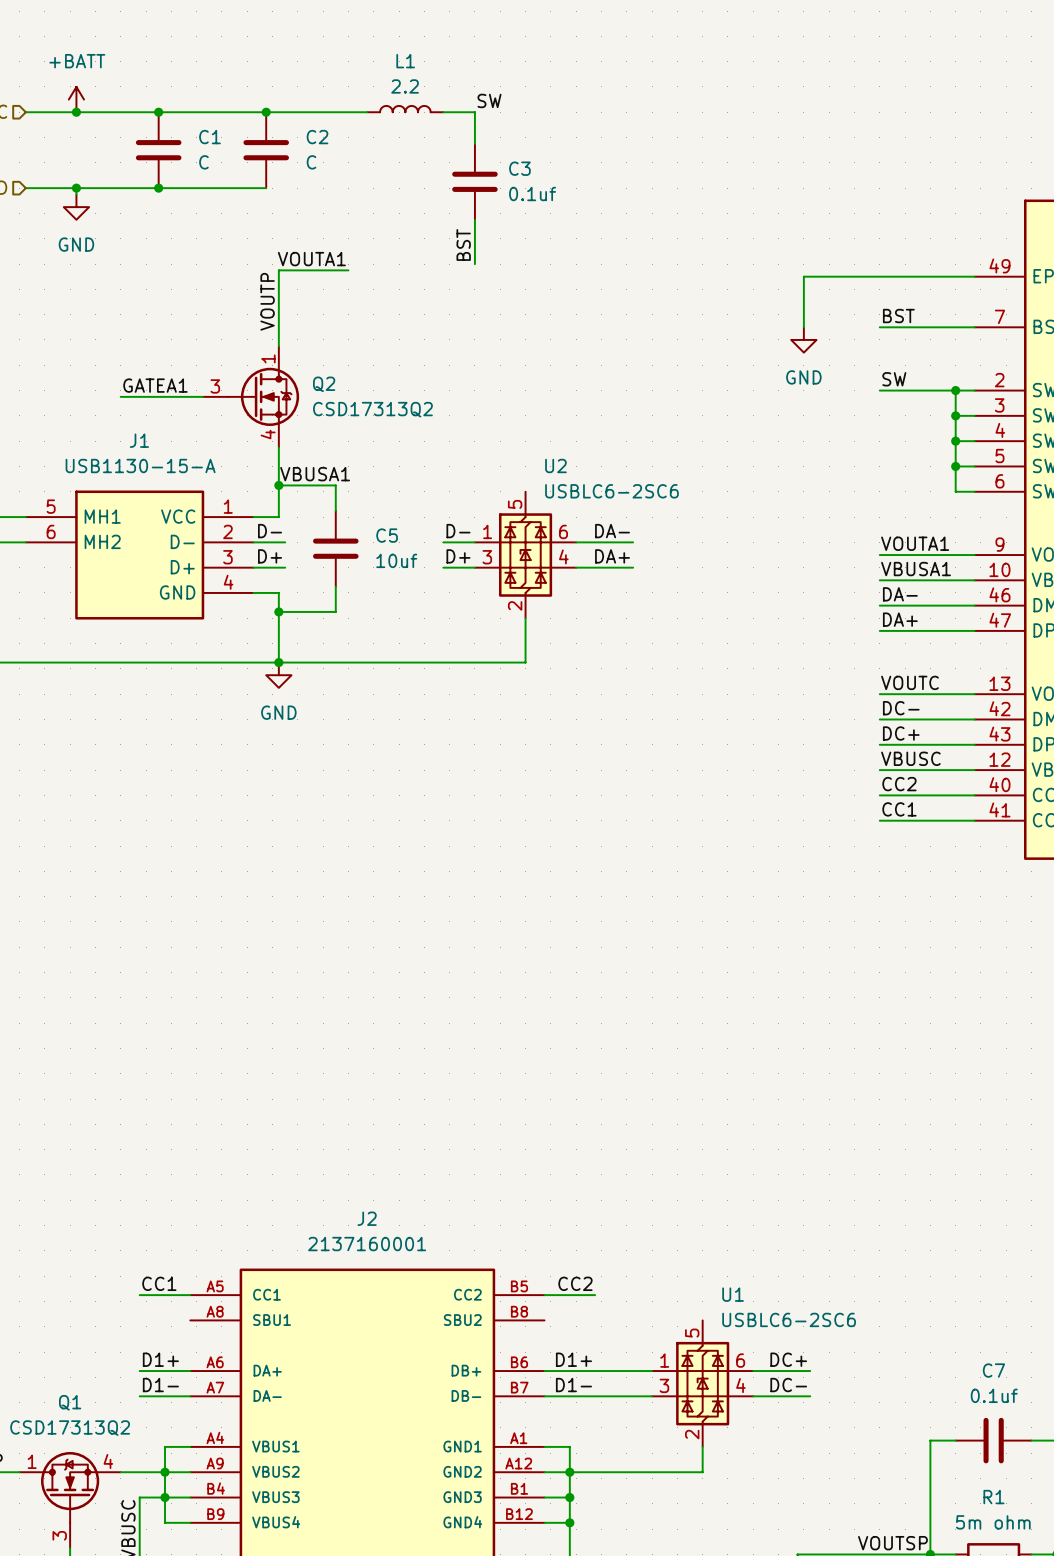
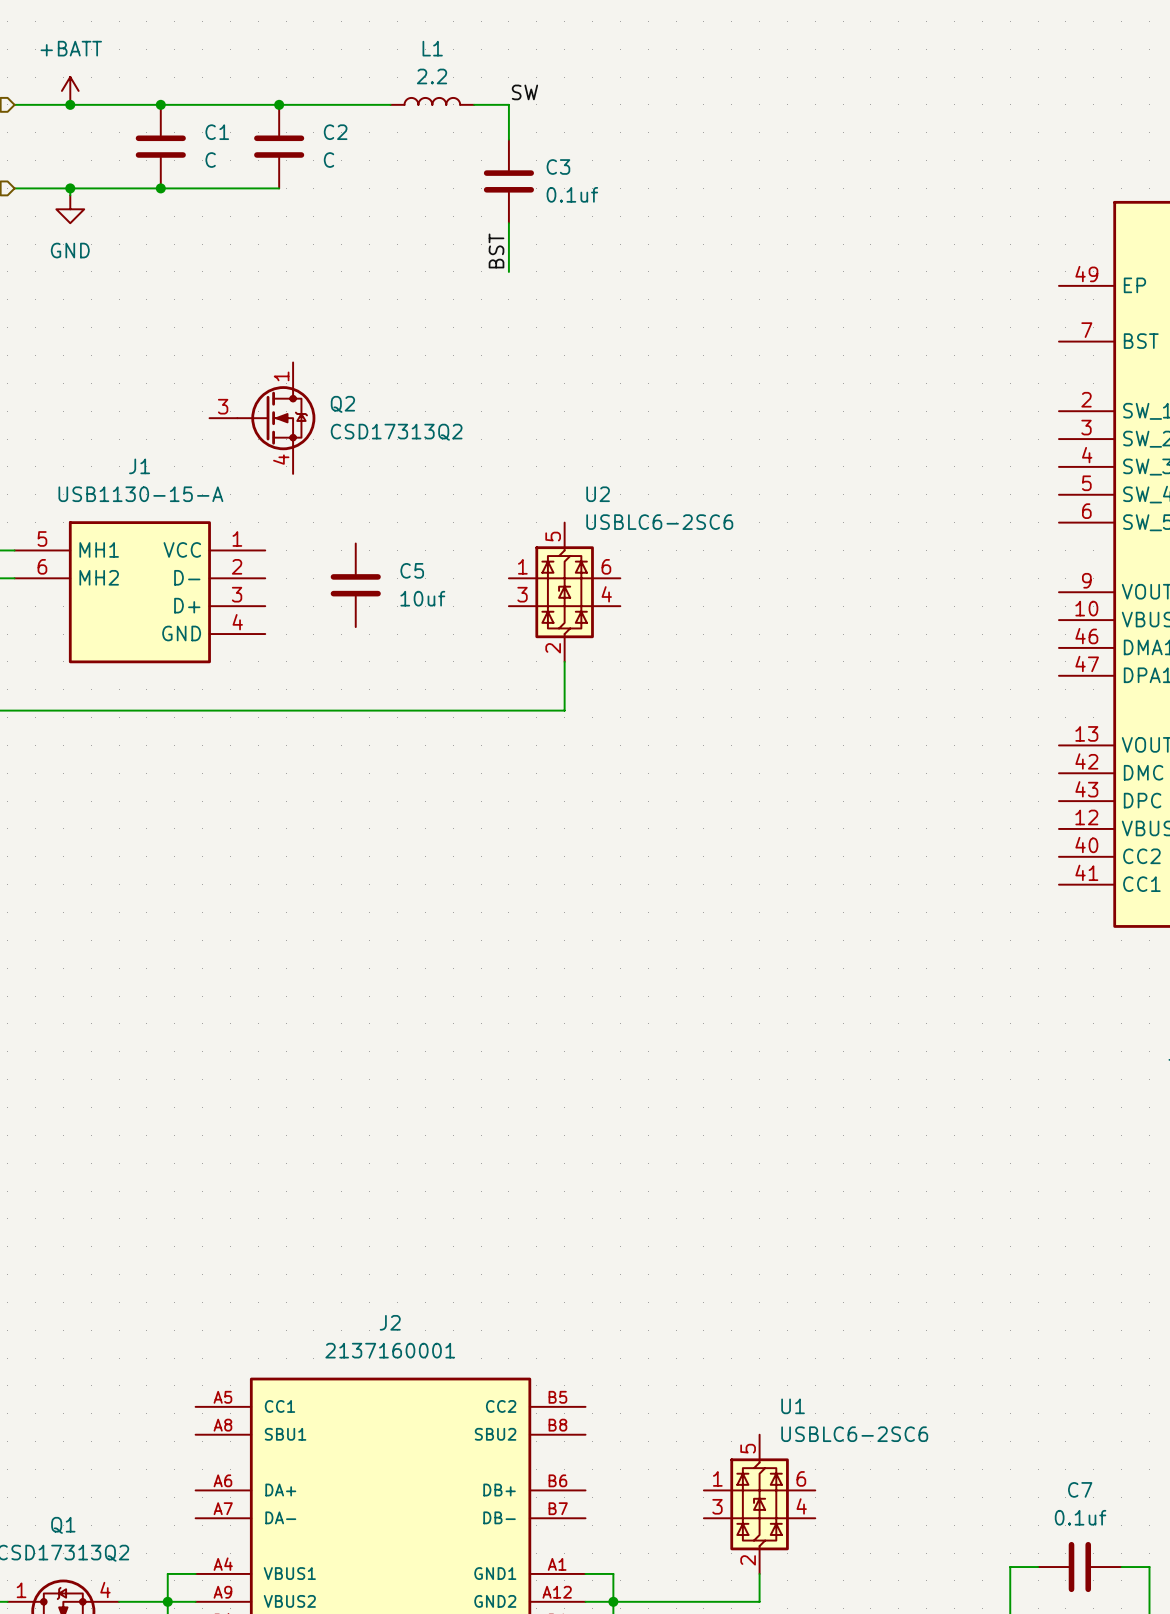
label: VOUTA1 (311, 259) -> none
wire: (348, 270) (278, 270) (278, 346) -> none
wire: (974, 276) (803, 276) (803, 327) -> none
label: VOUTP (267, 301) -> none
label: BST (898, 316) -> none
wire: (879, 327) (974, 327) -> none
power symbol: GND (803, 339) -> none
label: SW (894, 379) -> none
label: GATEA1 (155, 385) -> none
wire: (879, 390) (974, 390) -> none
wire: (955, 390) (955, 491) (974, 491) -> none
junction: (955, 390) -> none
wire: (120, 396) (202, 396) -> none
wire: (955, 415) (974, 415) -> none
junction: (955, 415) -> none
wire: (955, 441) (974, 441) -> none
junction: (955, 441) -> none
wire: (278, 447) (278, 517) (253, 517) -> none
wire: (955, 466) (974, 466) -> none
junction: (955, 466) -> none
label: VBUSA1 (315, 474) -> none
wire: (278, 485) (335, 485) (335, 510) -> none
junction: (278, 485) -> none
label: D- (270, 531) -> none
label: D- (458, 531) -> none
label: DA- (612, 531) -> none
wire: (253, 542) (285, 542) -> none
wire: (443, 542) (474, 542) -> none
wire: (576, 542) (633, 542) -> none
label: VOUTA1 (915, 543) -> none
wire: (879, 555) (974, 555) -> none
label: D+ (270, 556) -> none
label: D+ (458, 556) -> none
label: DA+ (612, 556) -> none
wire: (253, 567) (285, 567) -> none
wire: (443, 567) (474, 567) -> none
wire: (576, 567) (633, 567) -> none
label: VBUSA1 (916, 569) -> none
wire: (879, 580) (974, 580) -> none
wire: (335, 586) (335, 611) (278, 611) -> none
wire: (253, 592) (278, 592) (278, 662) -> none
label: DA- (900, 594) -> none
wire: (879, 605) (974, 605) -> none
junction: (278, 611) -> none
label: DA+ (900, 619) -> none
wire: (879, 630) (974, 630) -> none
junction: (278, 662) -> none
power symbol: GND (278, 675) -> none
label: VOUTC (910, 682) -> none
wire: (879, 694) (974, 694) -> none
label: DC- (901, 708) -> none
wire: (879, 719) (974, 719) -> none
label: DC+ (901, 733) -> none
wire: (879, 744) (974, 744) -> none
label: VBUSC (910, 758) -> none
wire: (879, 770) (974, 770) -> none
label: CC2 (899, 784) -> none
wire: (879, 795) (974, 795) -> none
label: CC1 (899, 809) -> none
wire: (879, 820) (974, 820) -> none
label: CC1 (159, 1283) -> none
label: CC2 (575, 1283) -> none
wire: (139, 1295) (190, 1295) -> none
wire: (544, 1295) (595, 1295) -> none
label: D1+ (160, 1359) -> none
label: D1+ (573, 1359) -> none
label: DC+ (788, 1359) -> none
wire: (139, 1371) (190, 1371) -> none
wire: (544, 1371) (652, 1371) -> none
wire: (753, 1371) (810, 1371) -> none
label: D1- (160, 1385) -> none
label: D1- (573, 1385) -> none
label: DC- (788, 1385) -> none
wire: (139, 1396) (190, 1396) -> none
wire: (544, 1396) (652, 1396) -> none
wire: (753, 1396) (810, 1396) -> none

